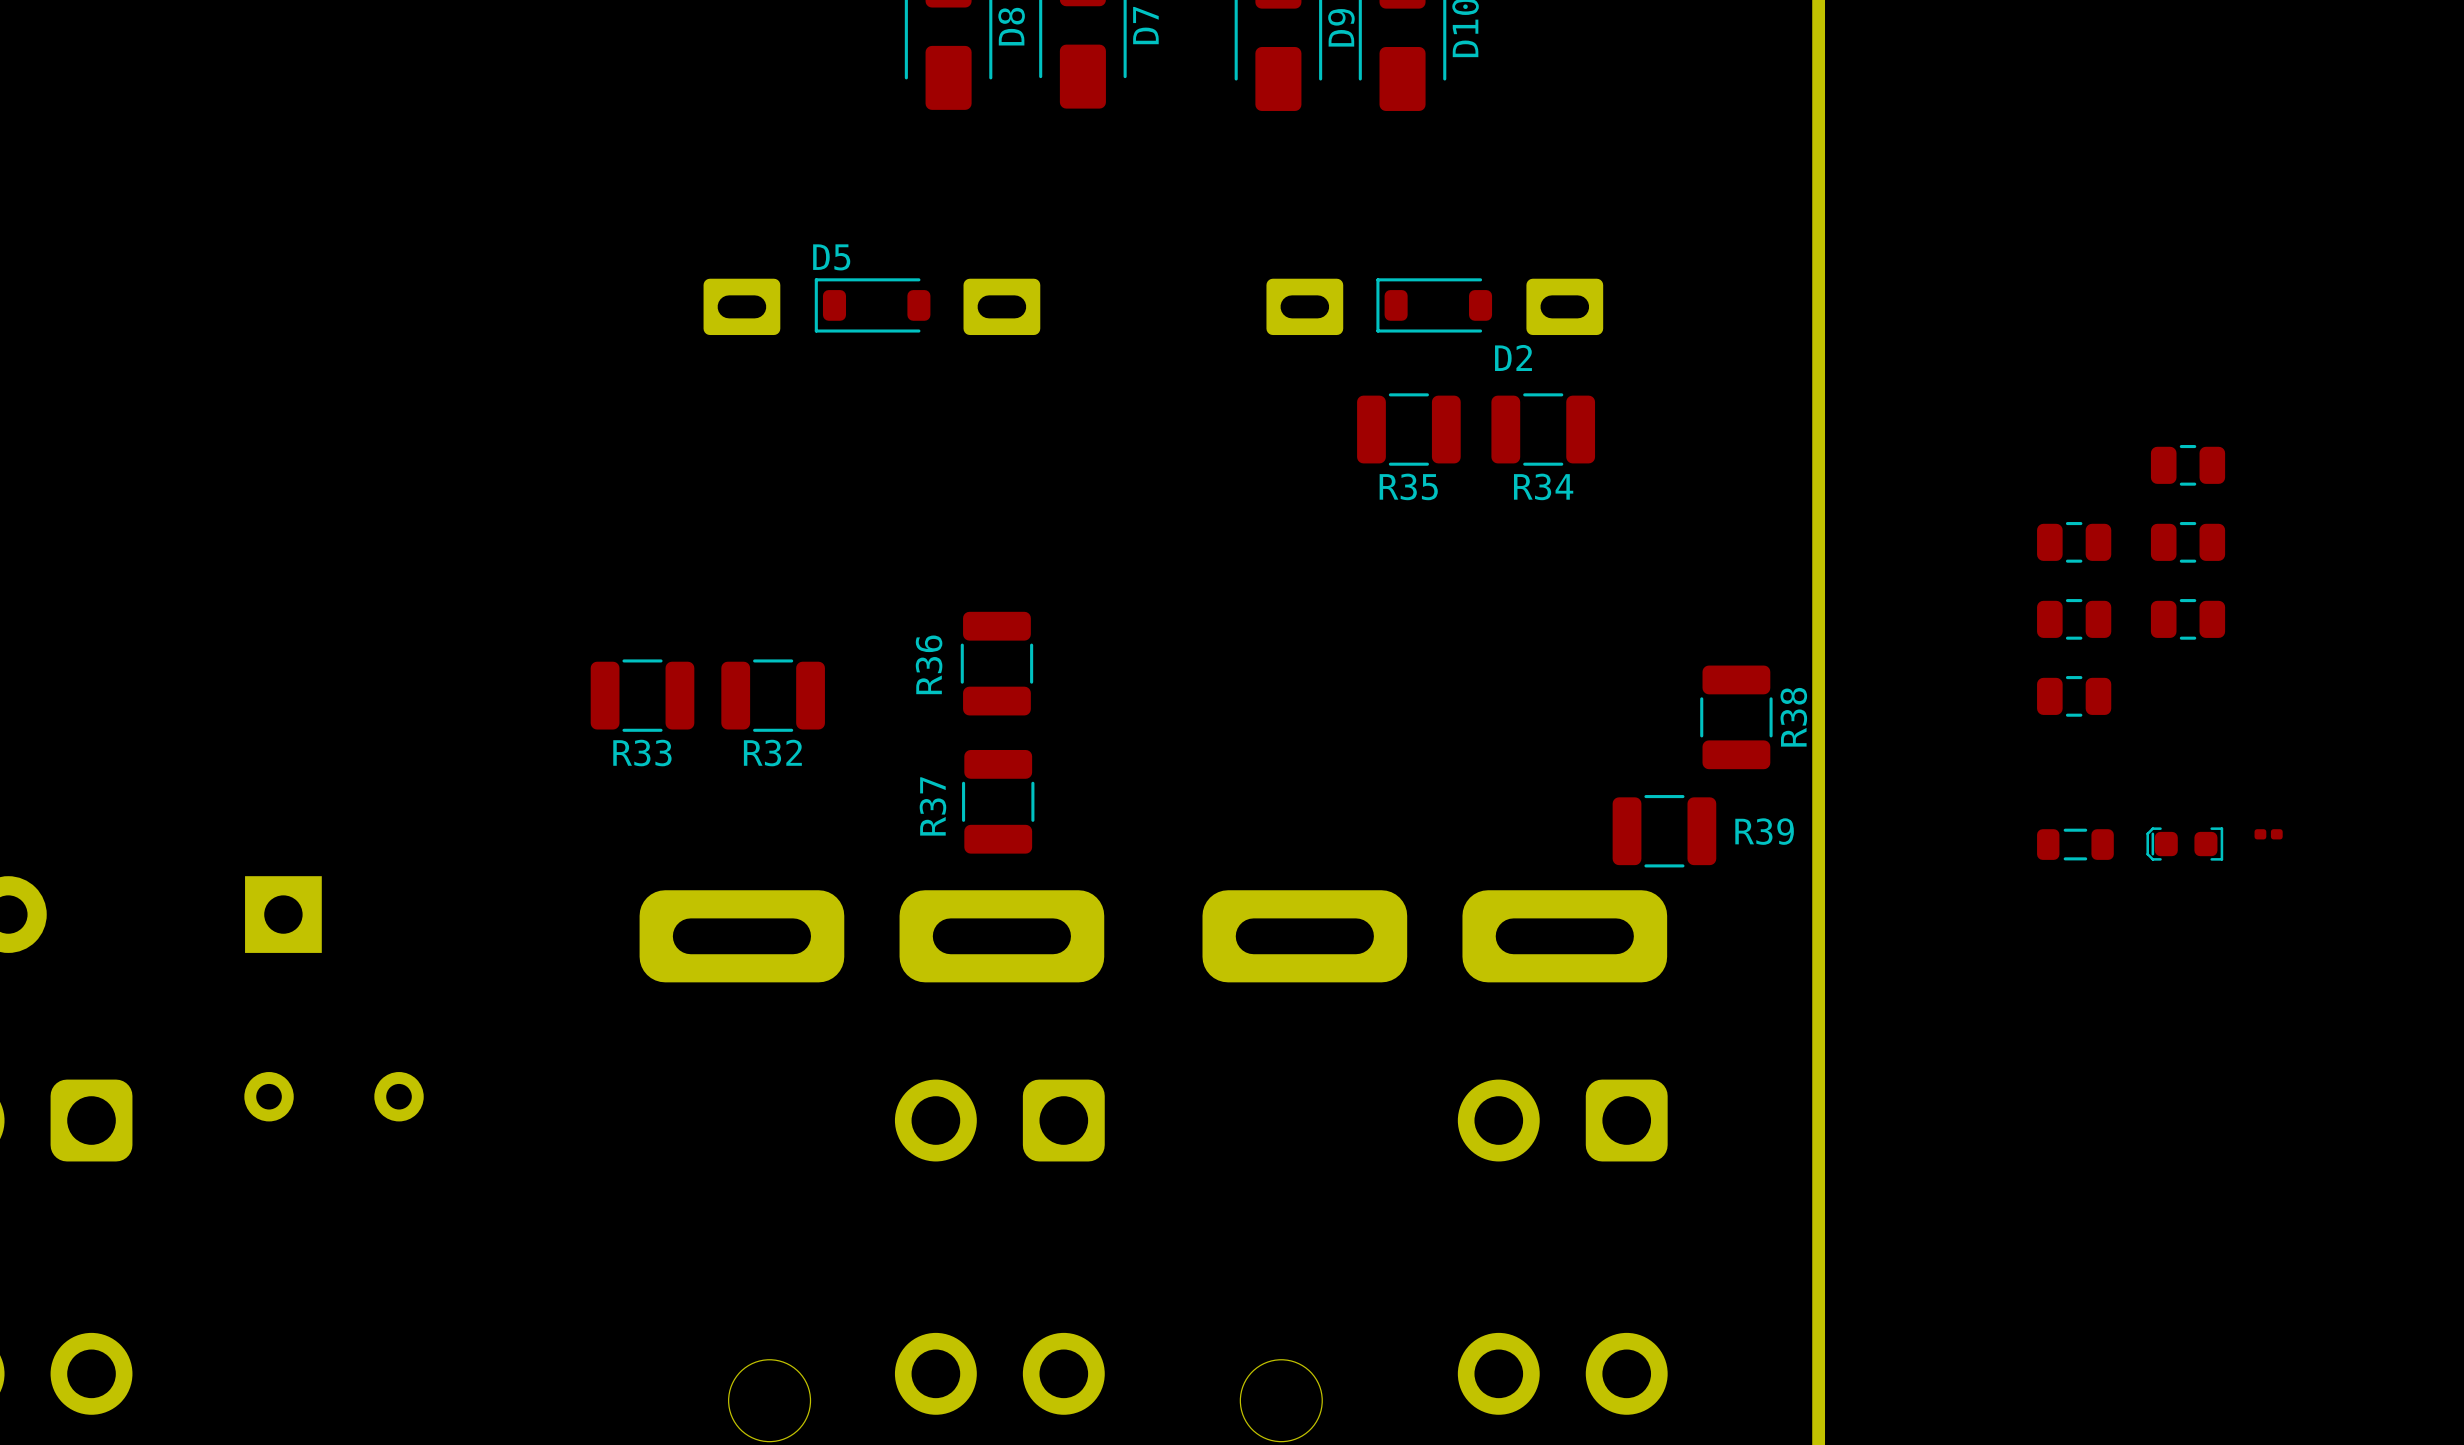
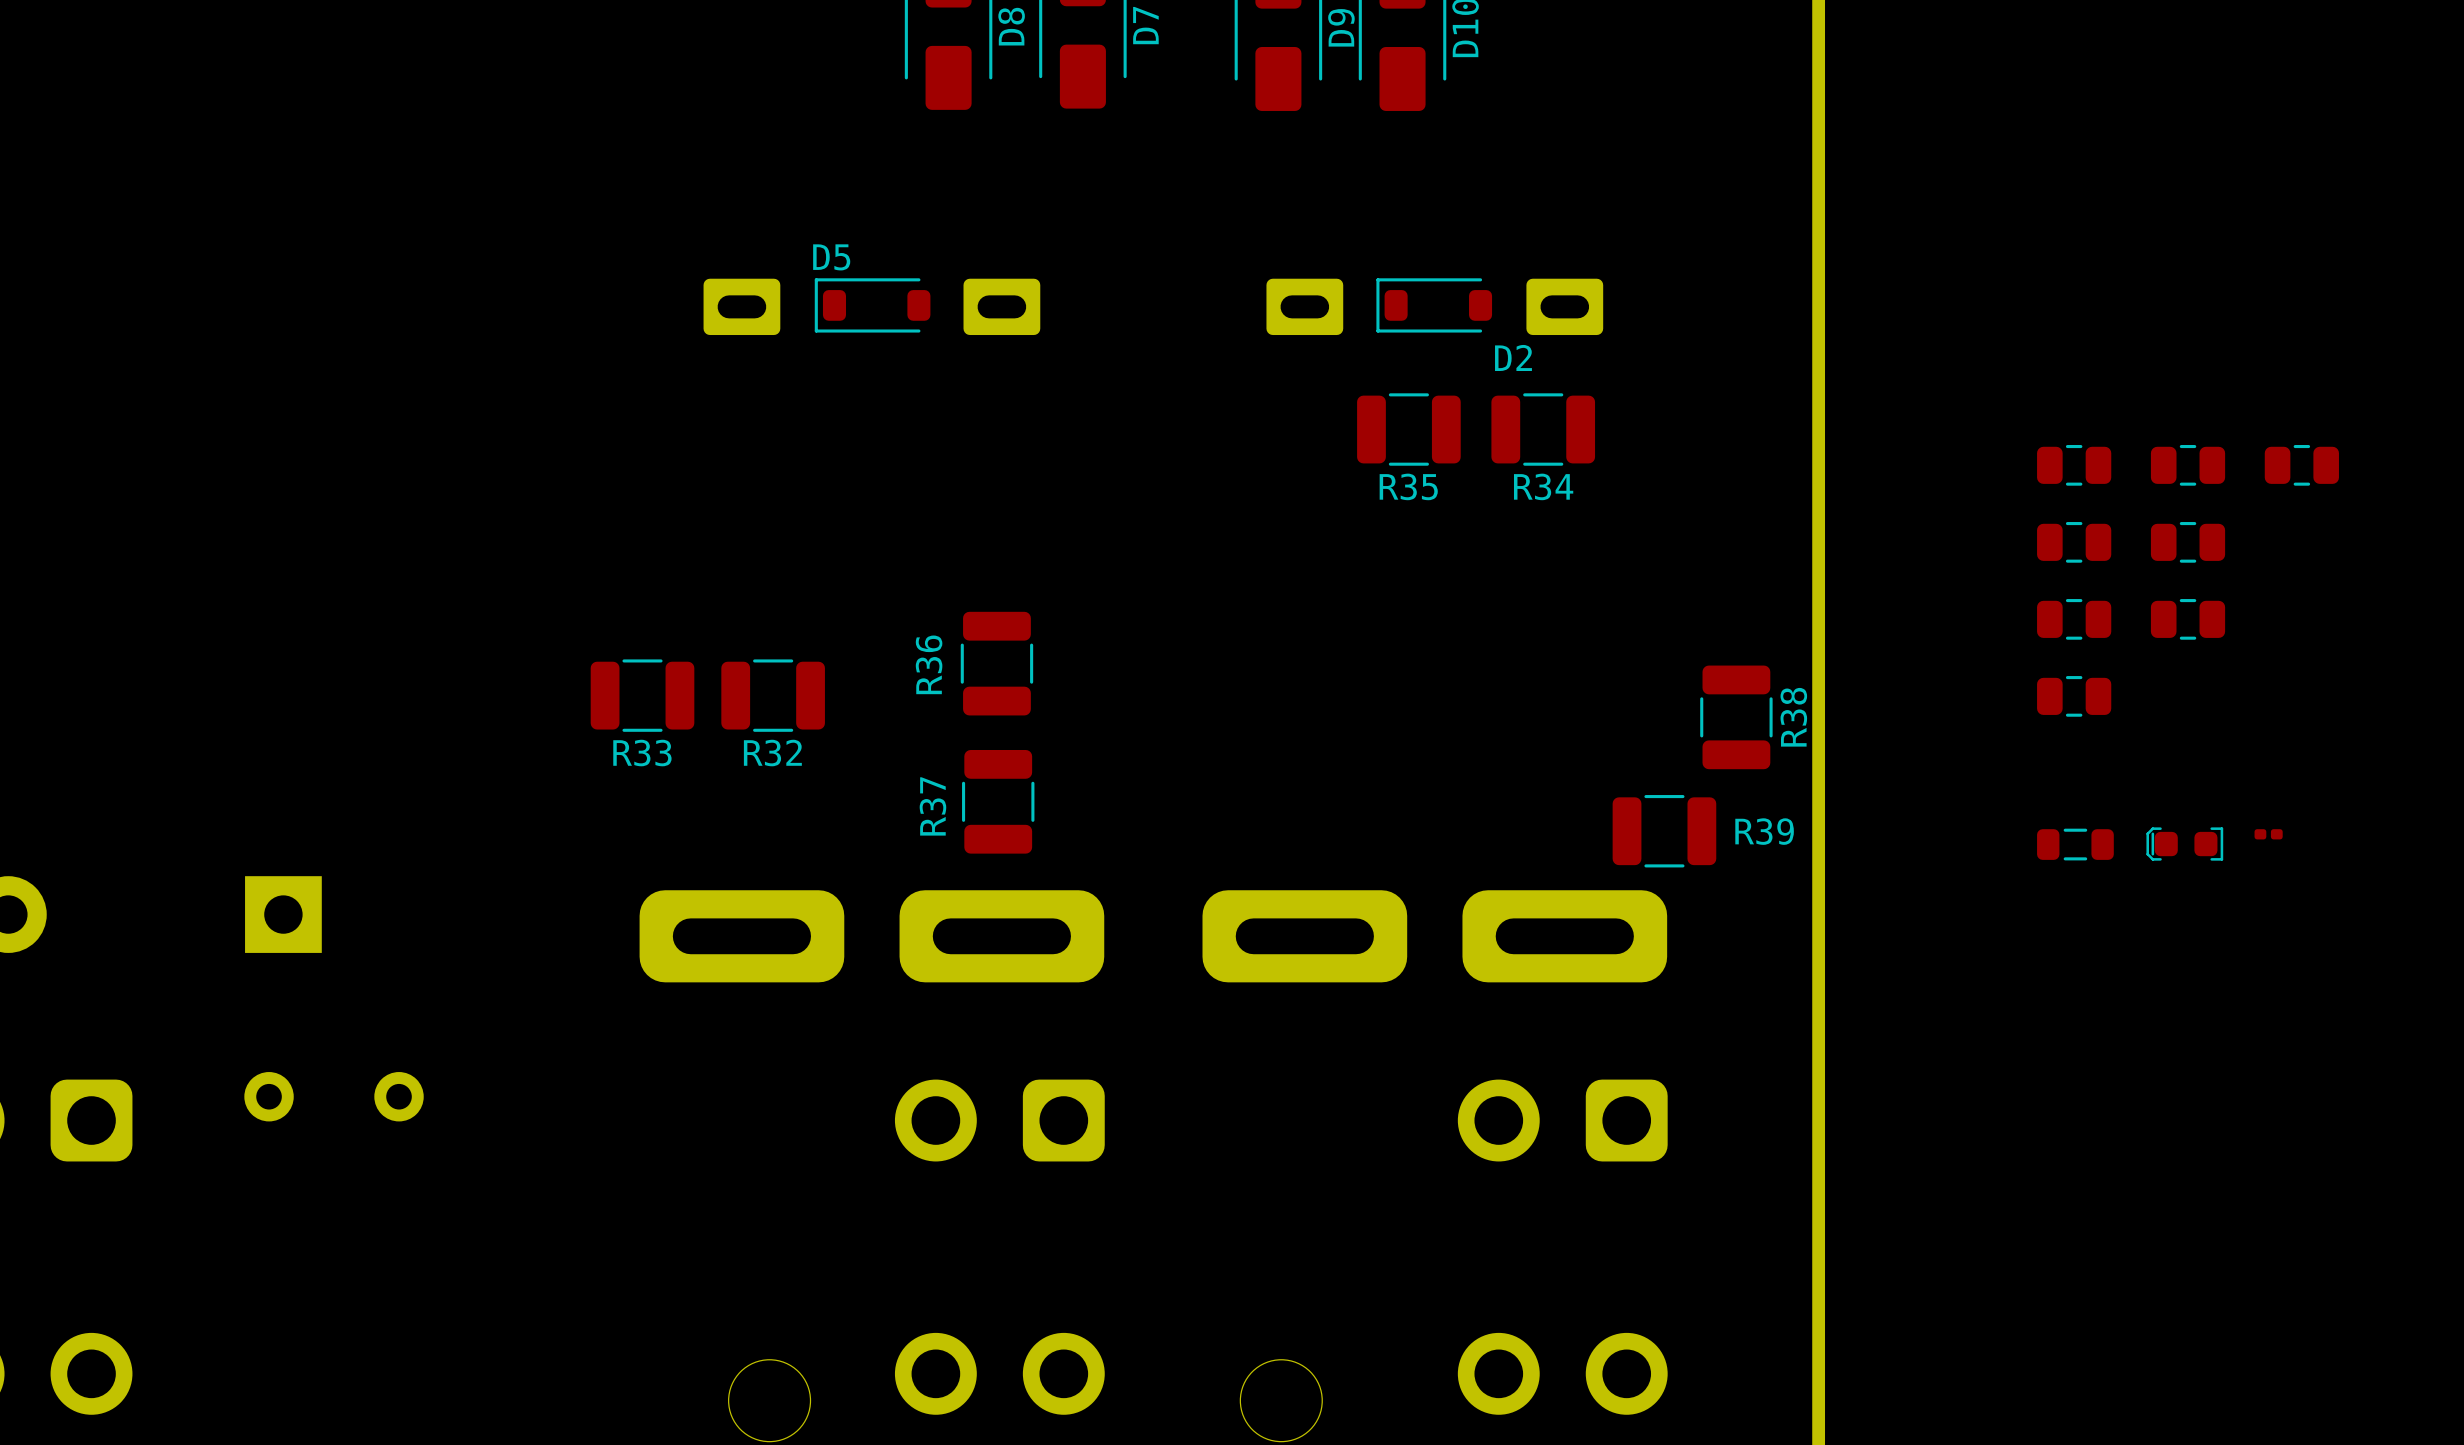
part: none -> (2074, 465)
part: none -> (2301, 465)

